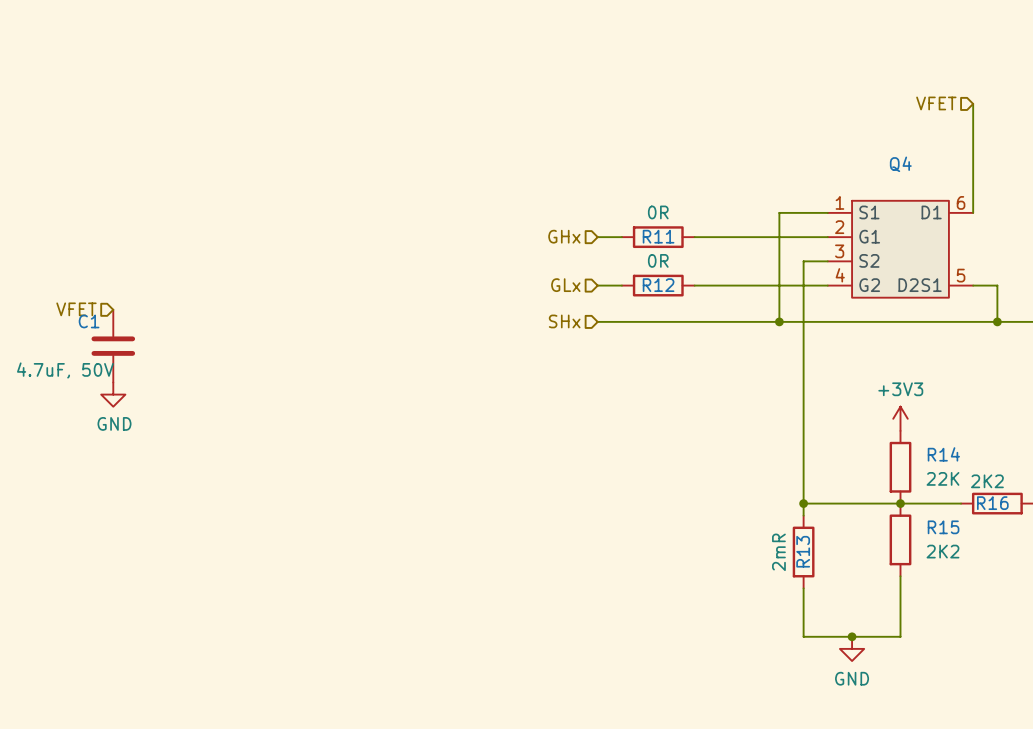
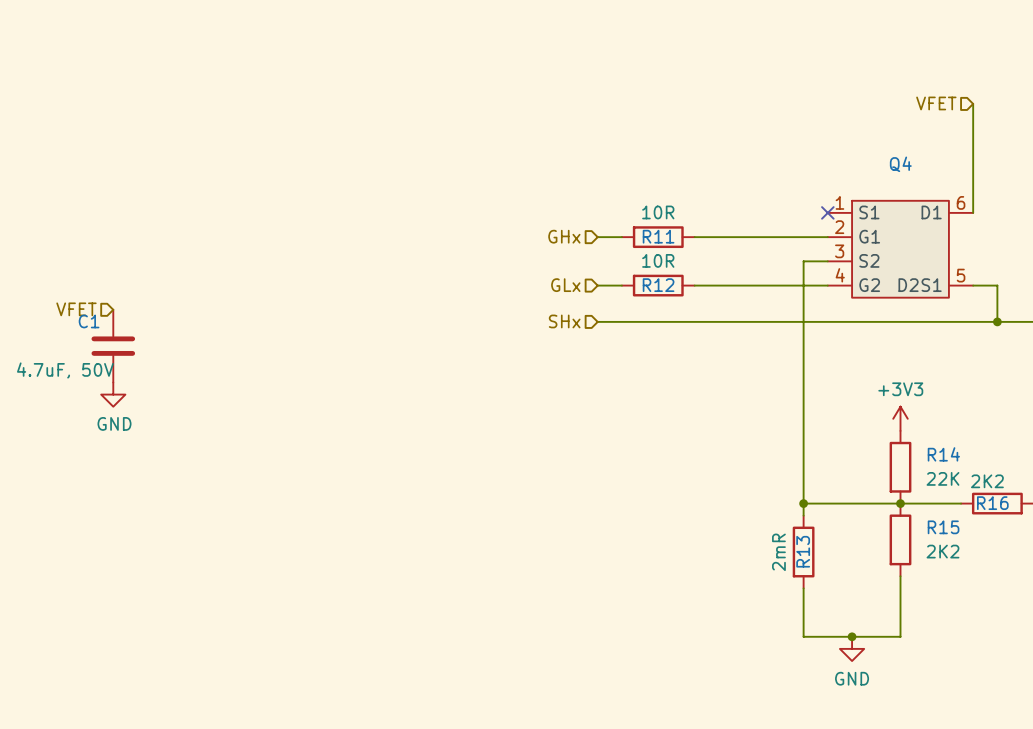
R11 value: 0R (658, 212) -> 10R (658, 212)
wire: (827, 212) (779, 212) (779, 321) -> none
no-connect mark: none -> (827, 212)
R12 value: 0R (658, 260) -> 10R (658, 260)
junction: (779, 321) -> none

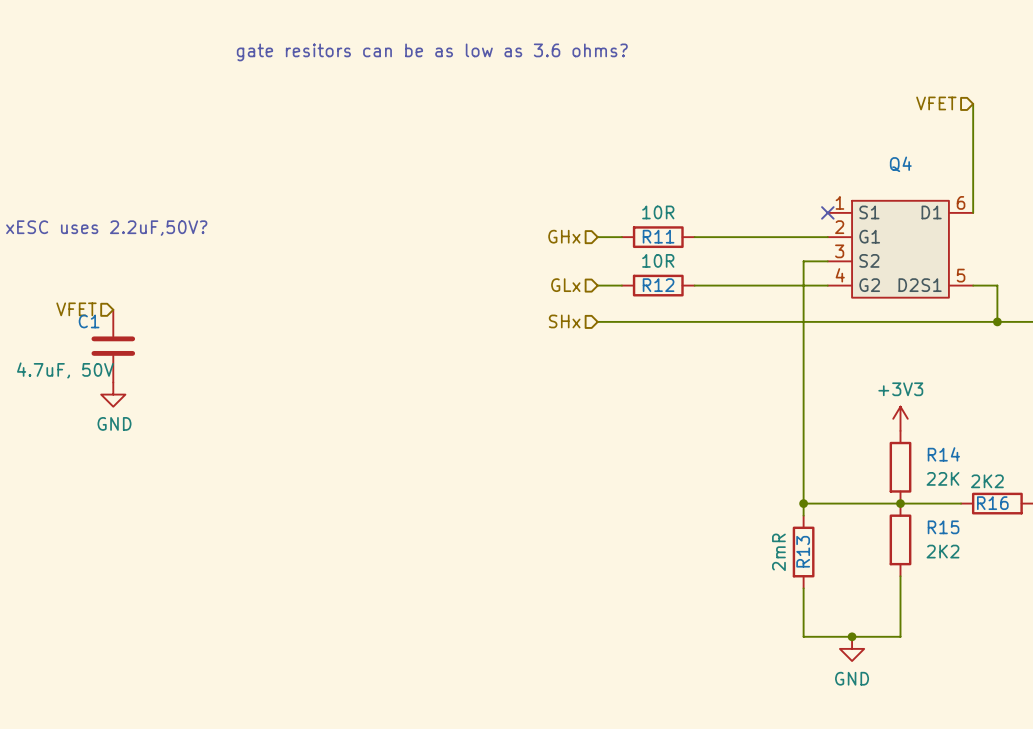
text: none -> gate resitors can be as low as 3.6 ohms? (432, 52)
text: none -> xESC uses 2.2uF,50V? (106, 228)

